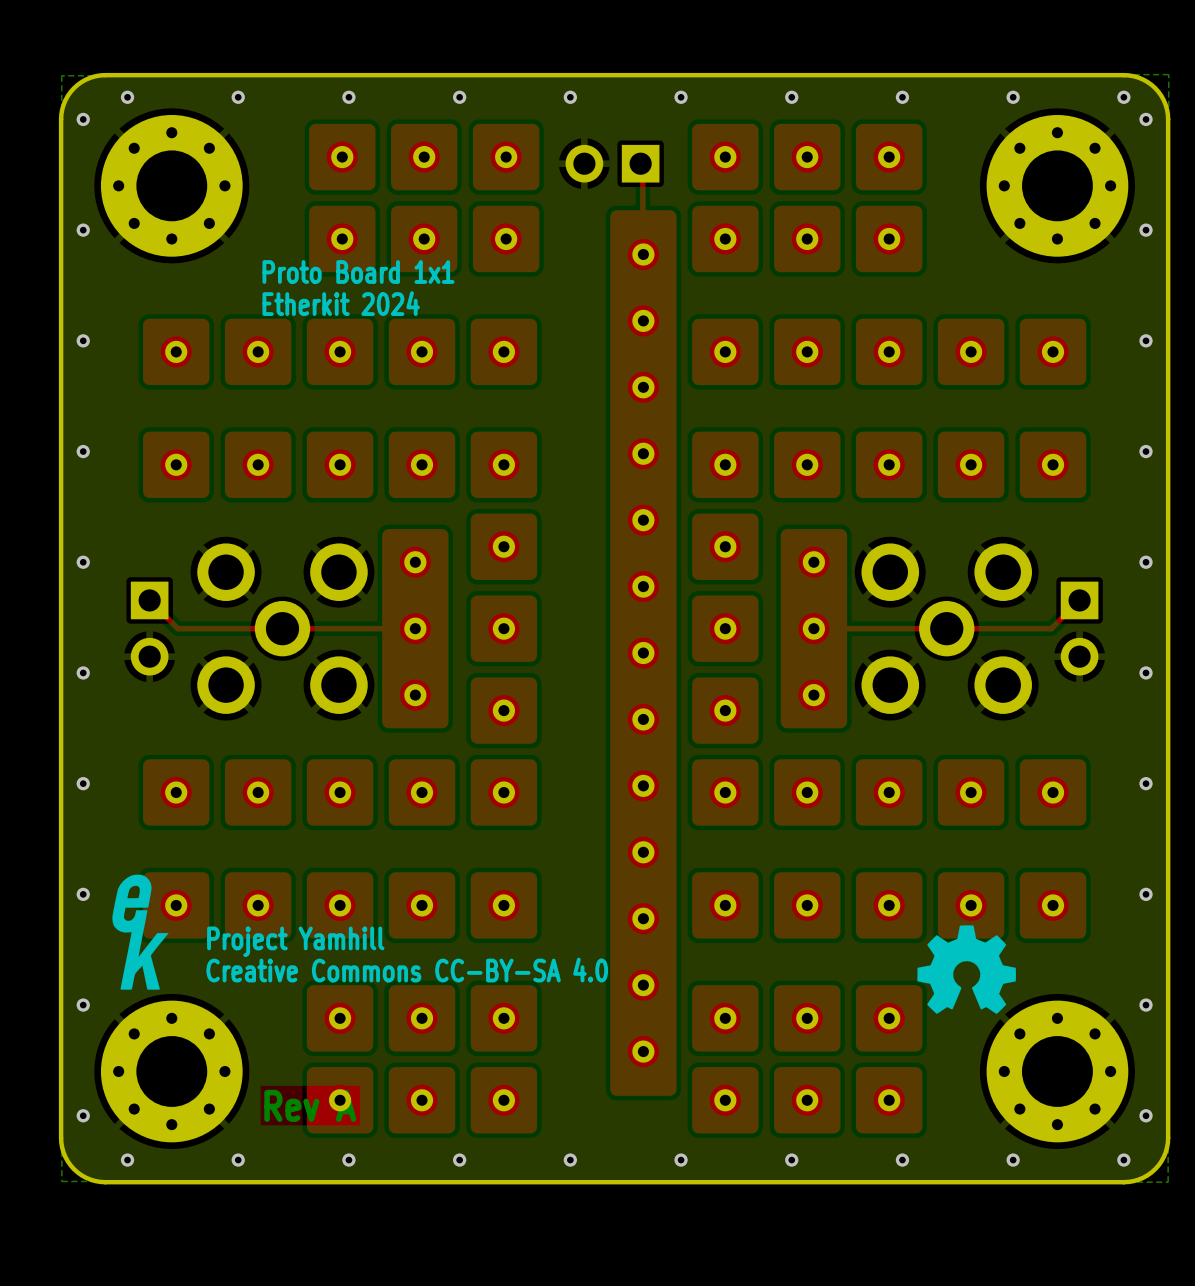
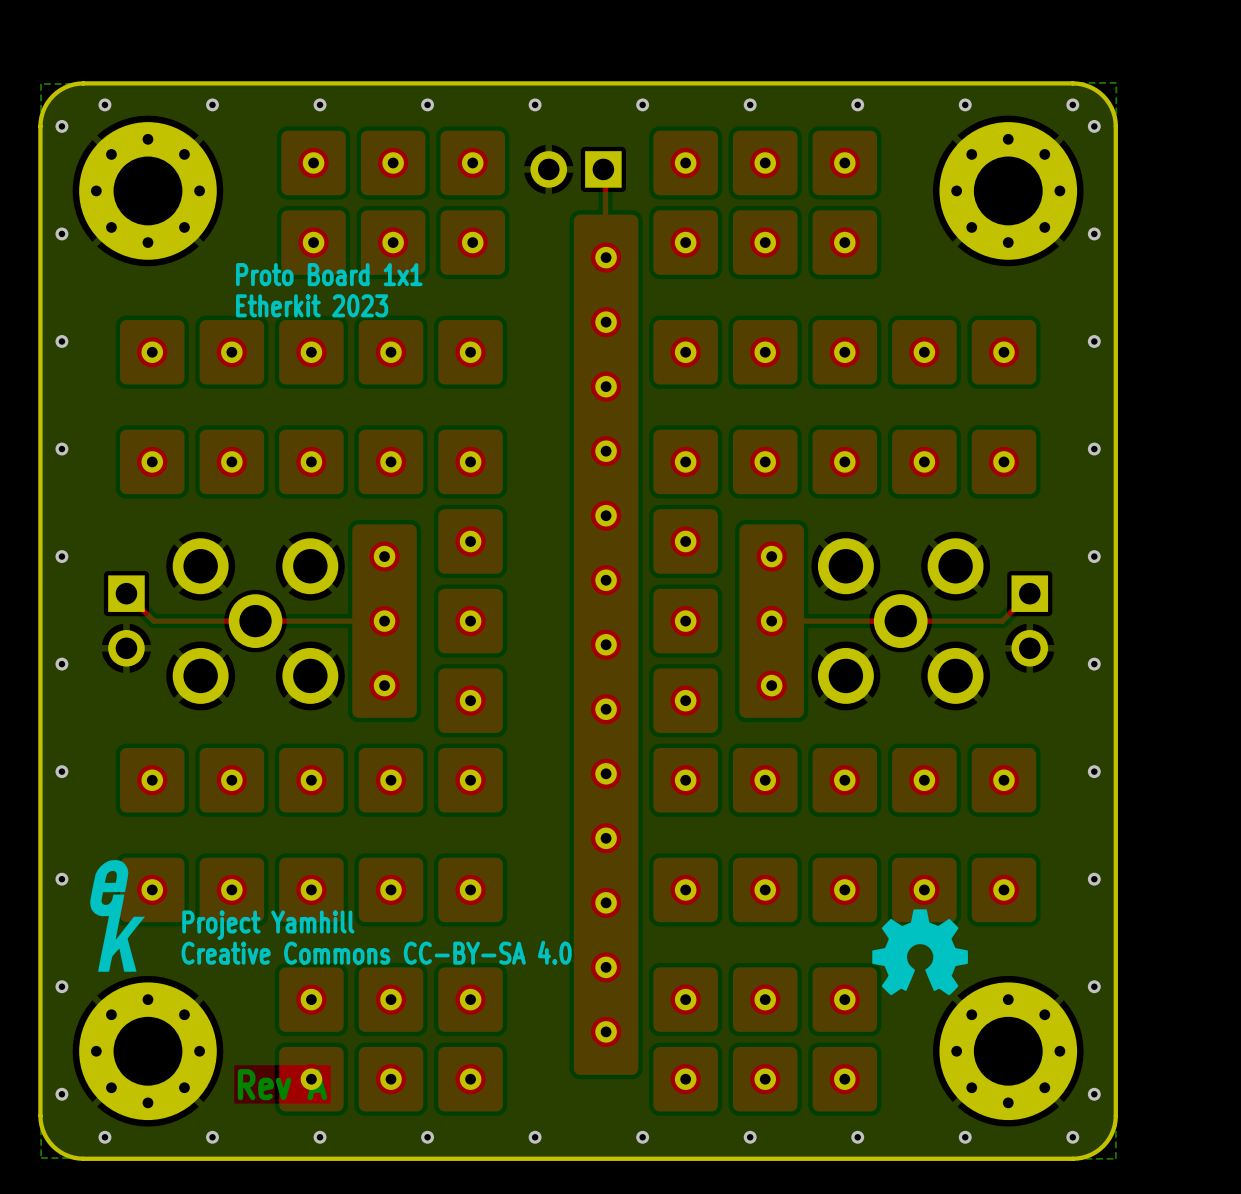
text: Etherkit 2024 (341, 303) -> Etherkit 2023 (312, 305)

